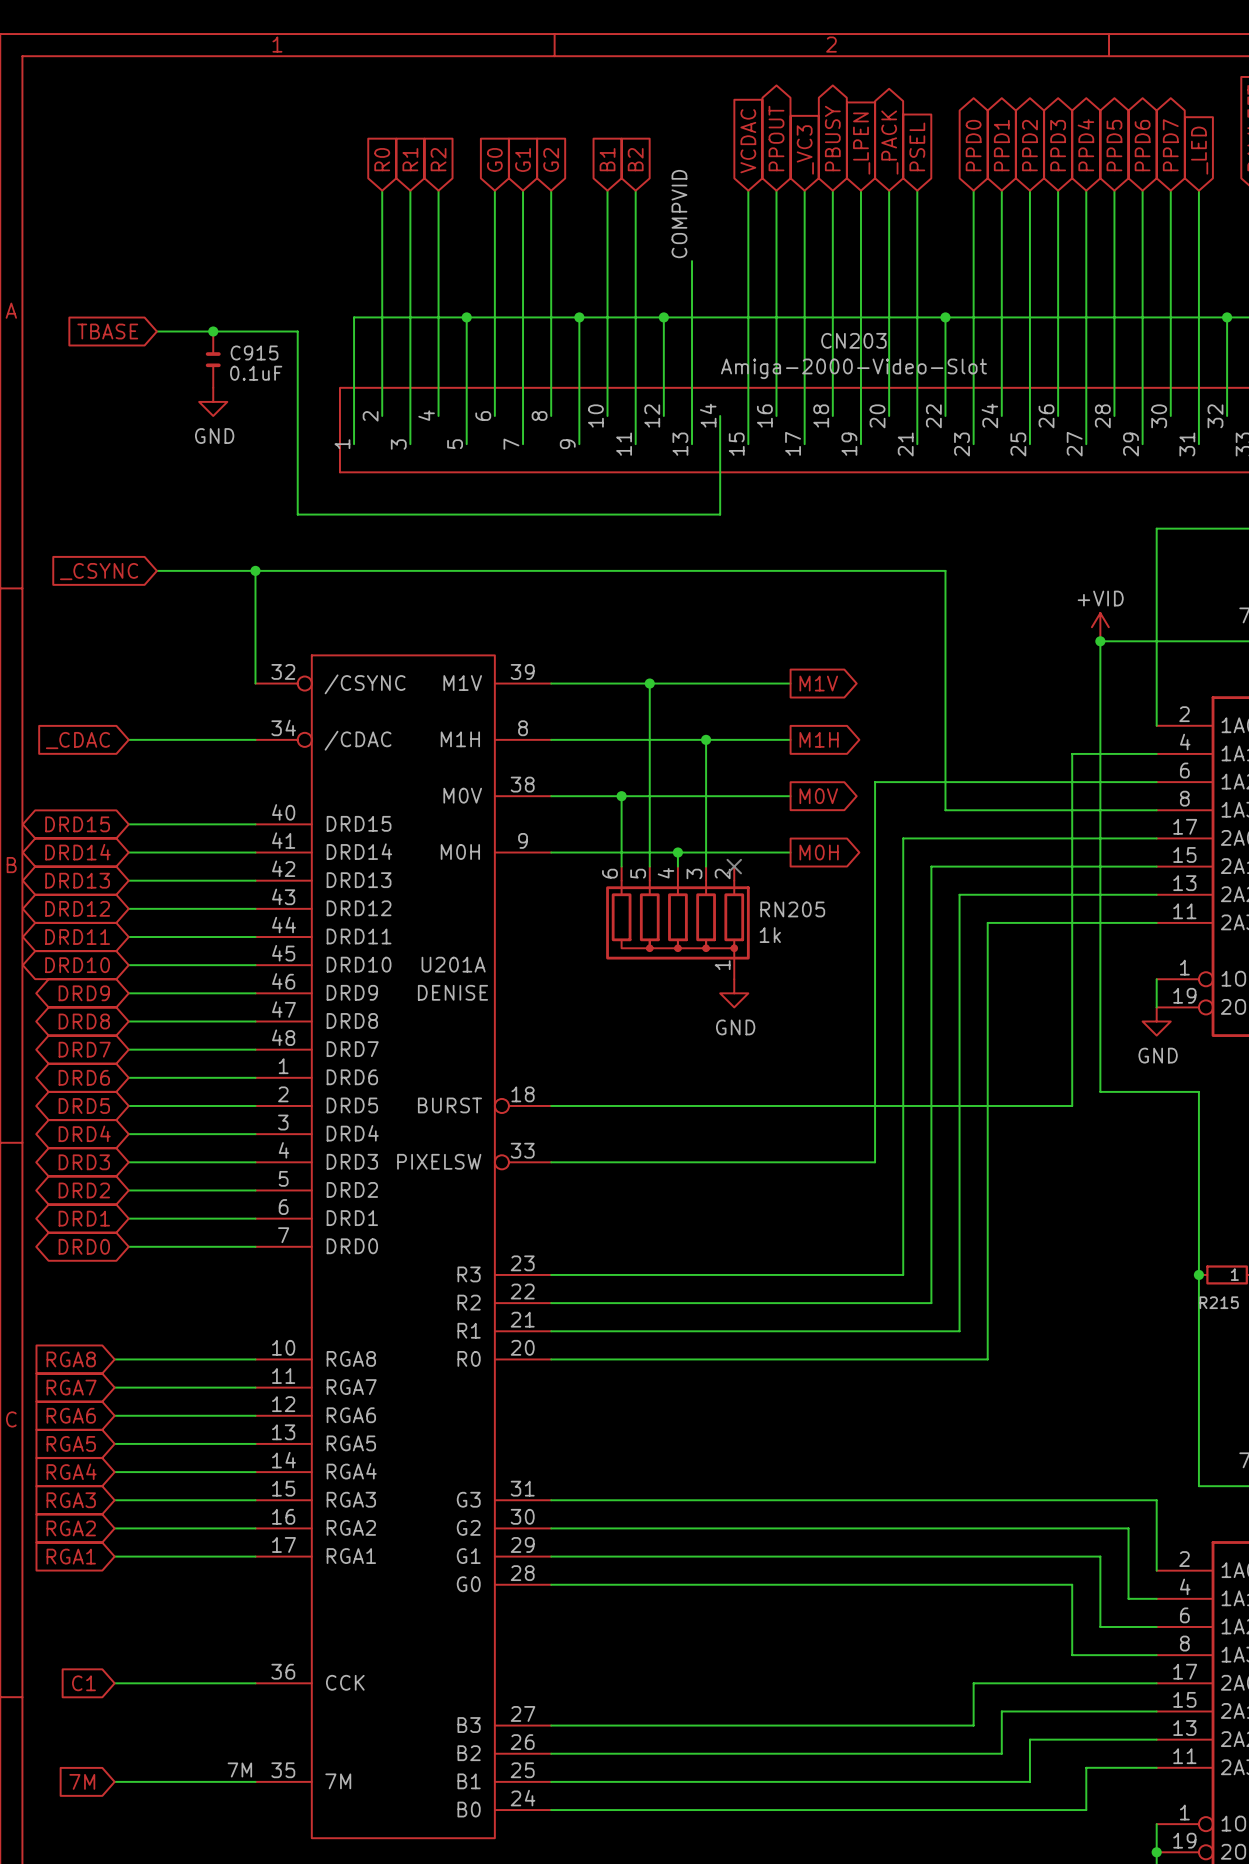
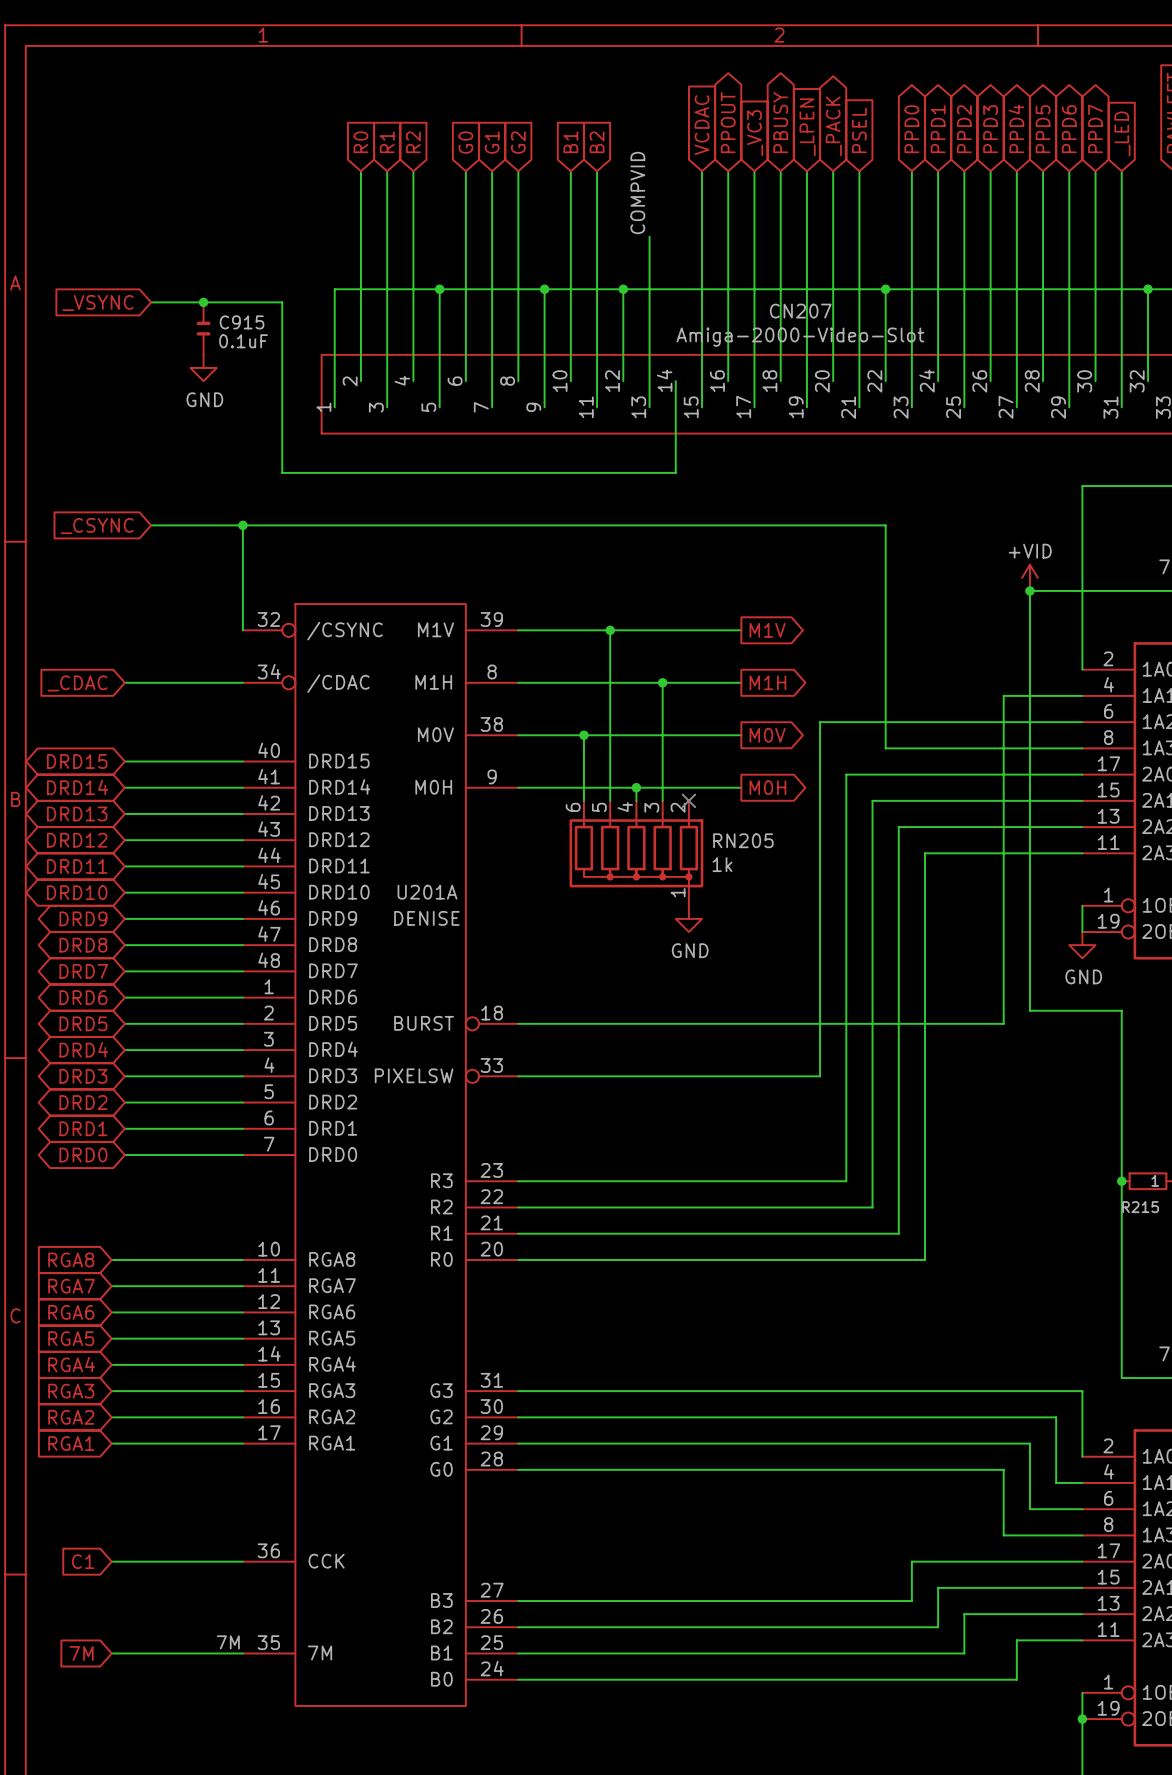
global label: TBASE (107, 331) -> _VSYNC (98, 303)
CN203 name: CN203 (853, 340) -> CN207 (800, 311)

